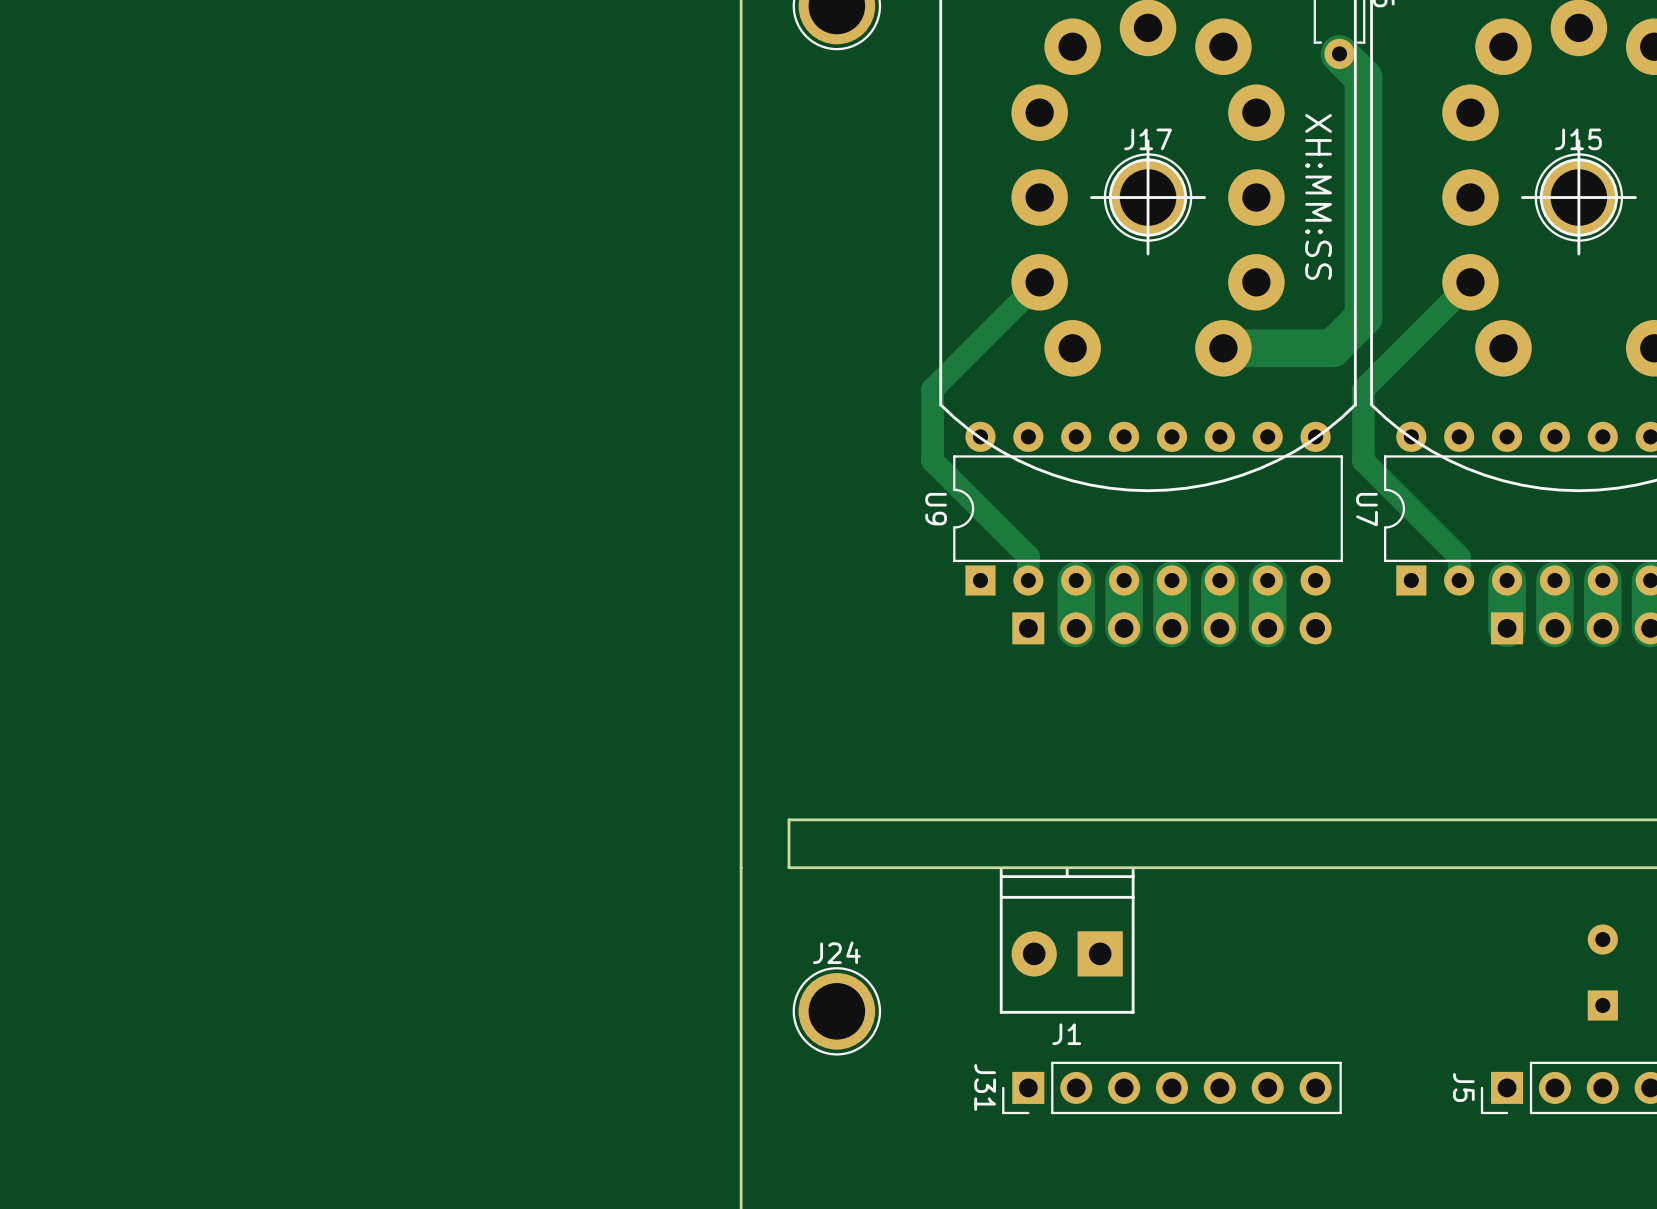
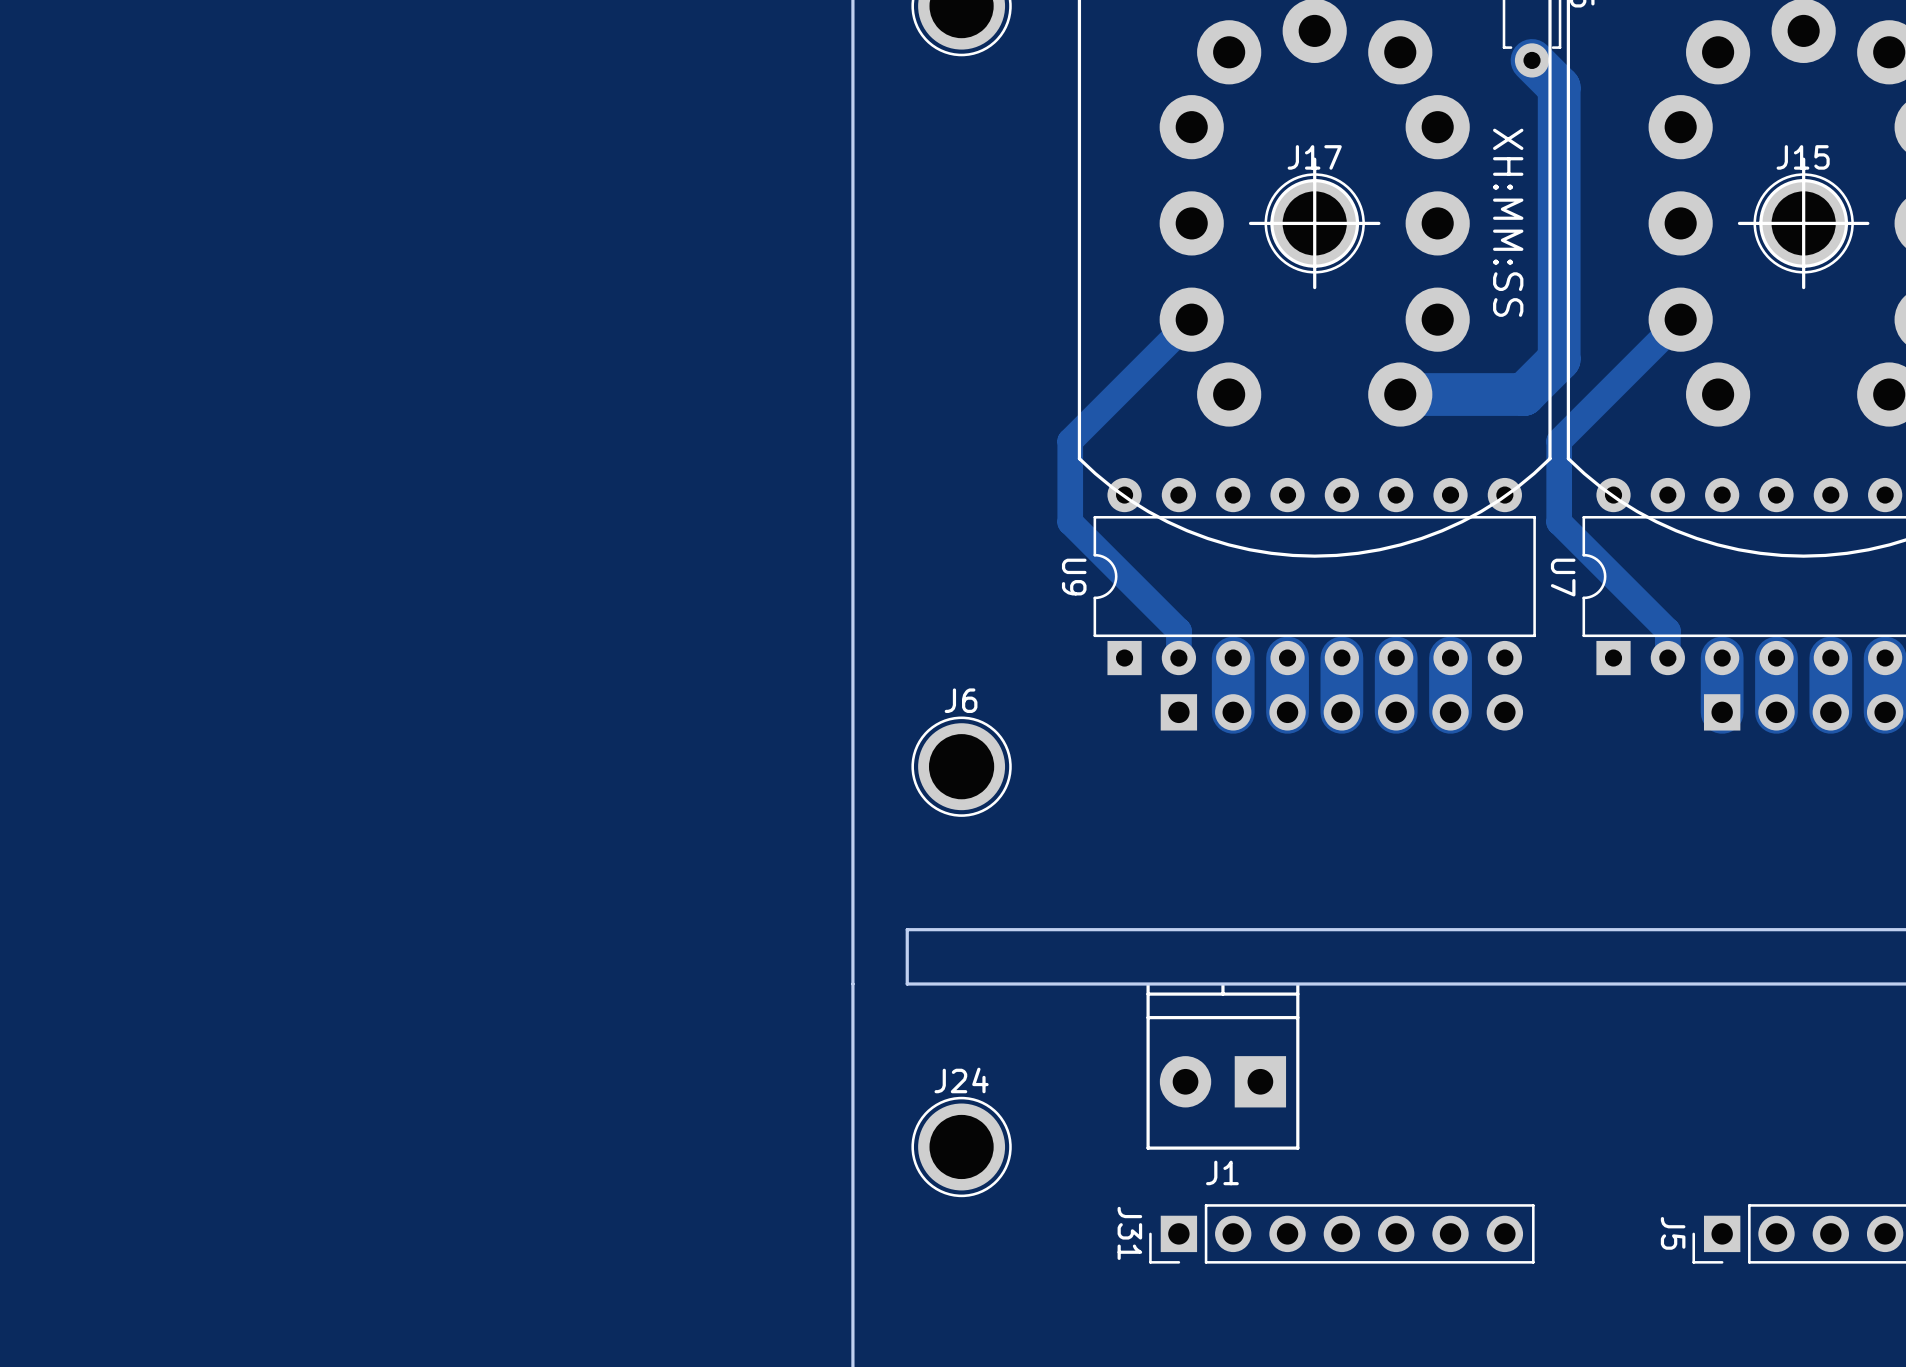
J6: none -> (961, 766)
part: (1602, 972) -> none

